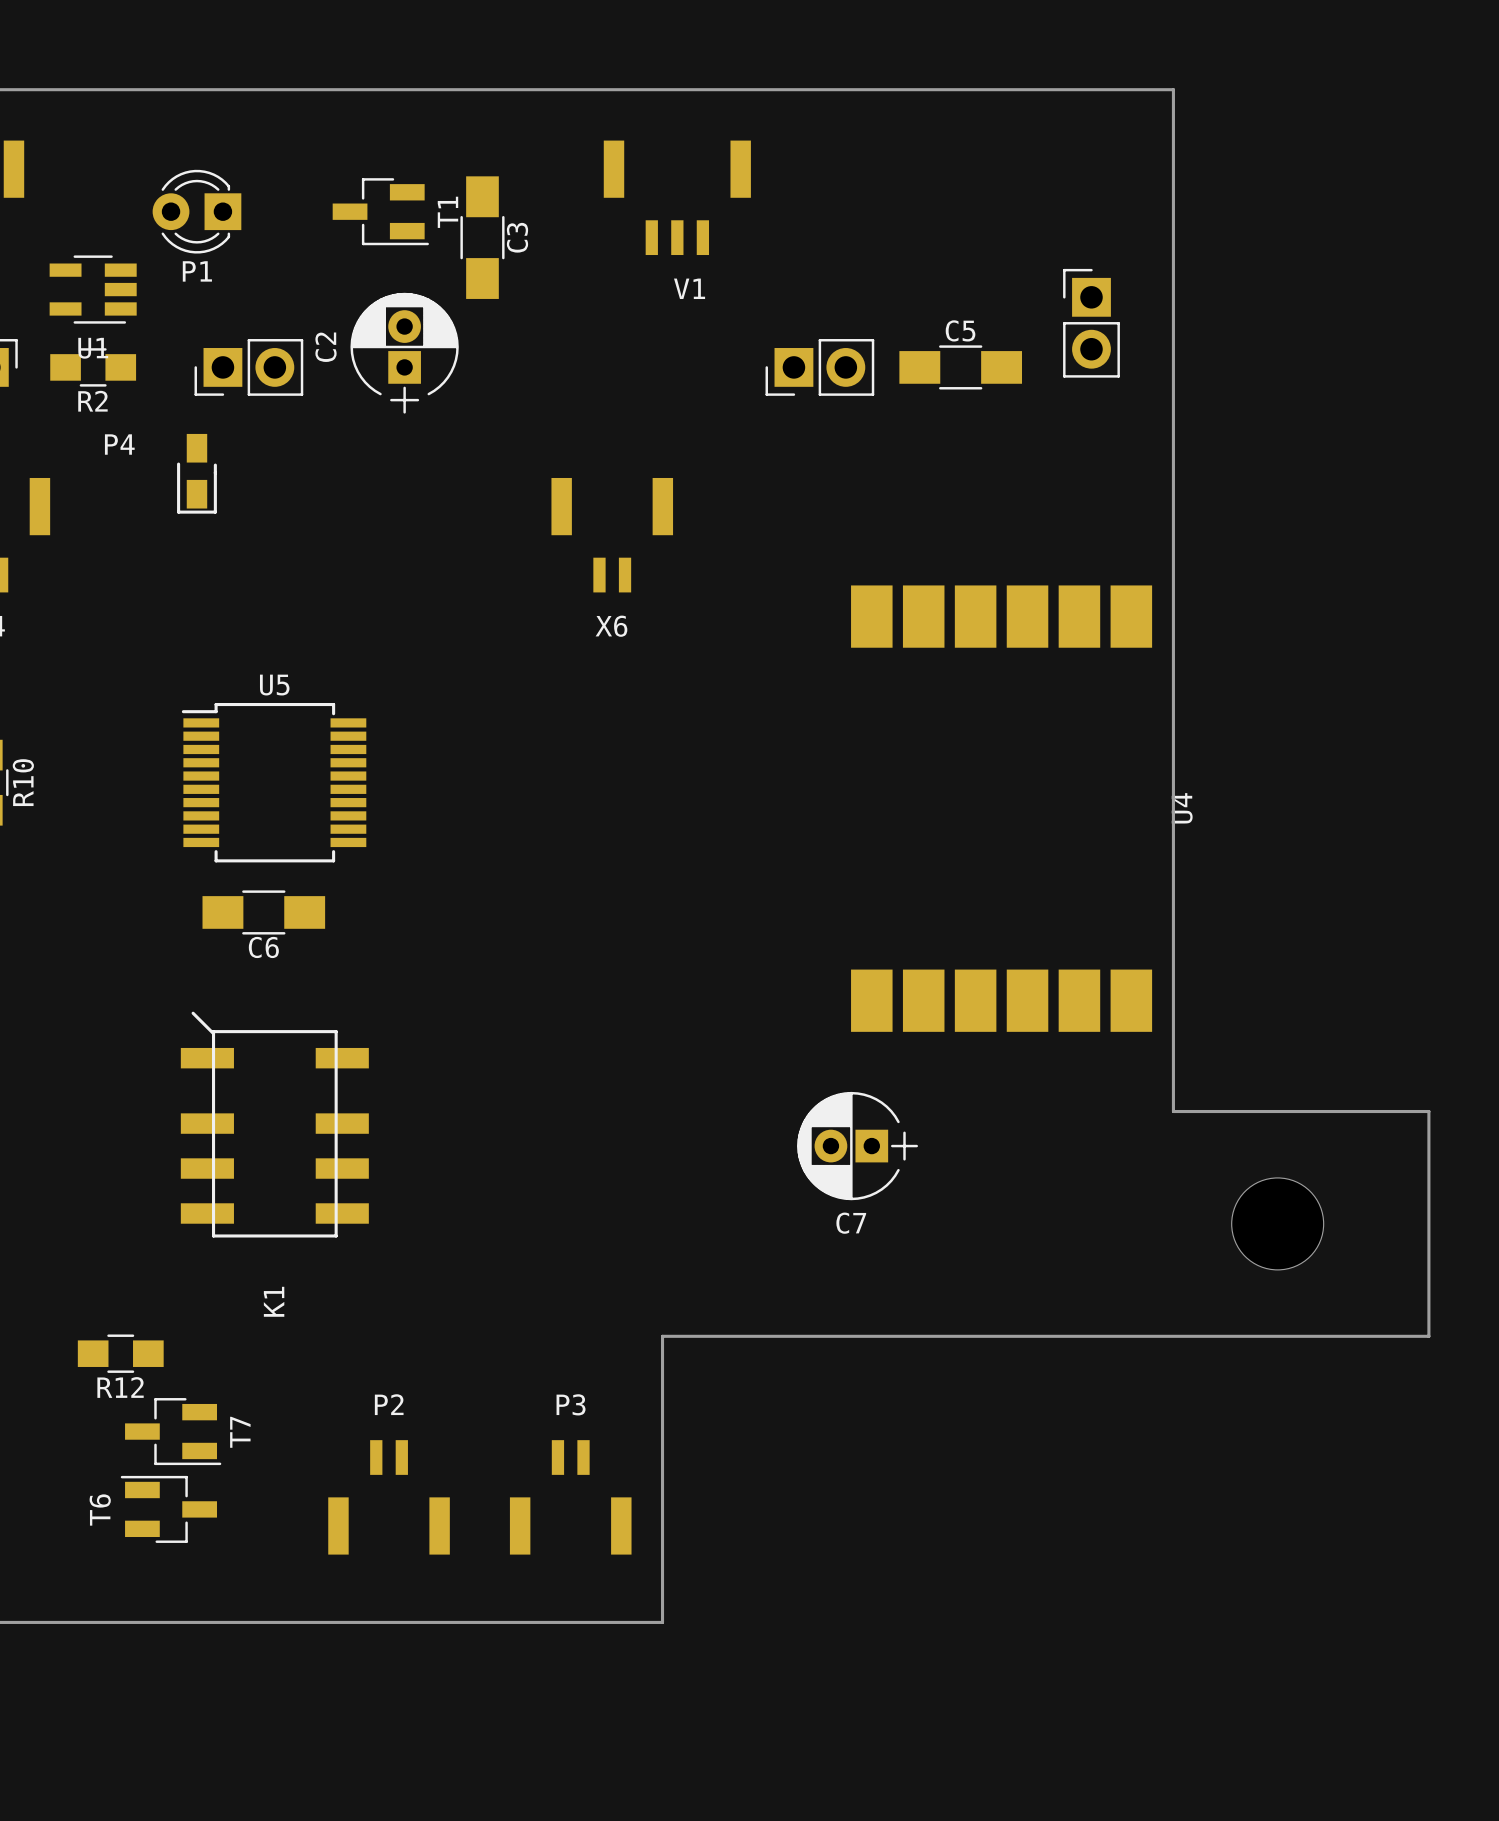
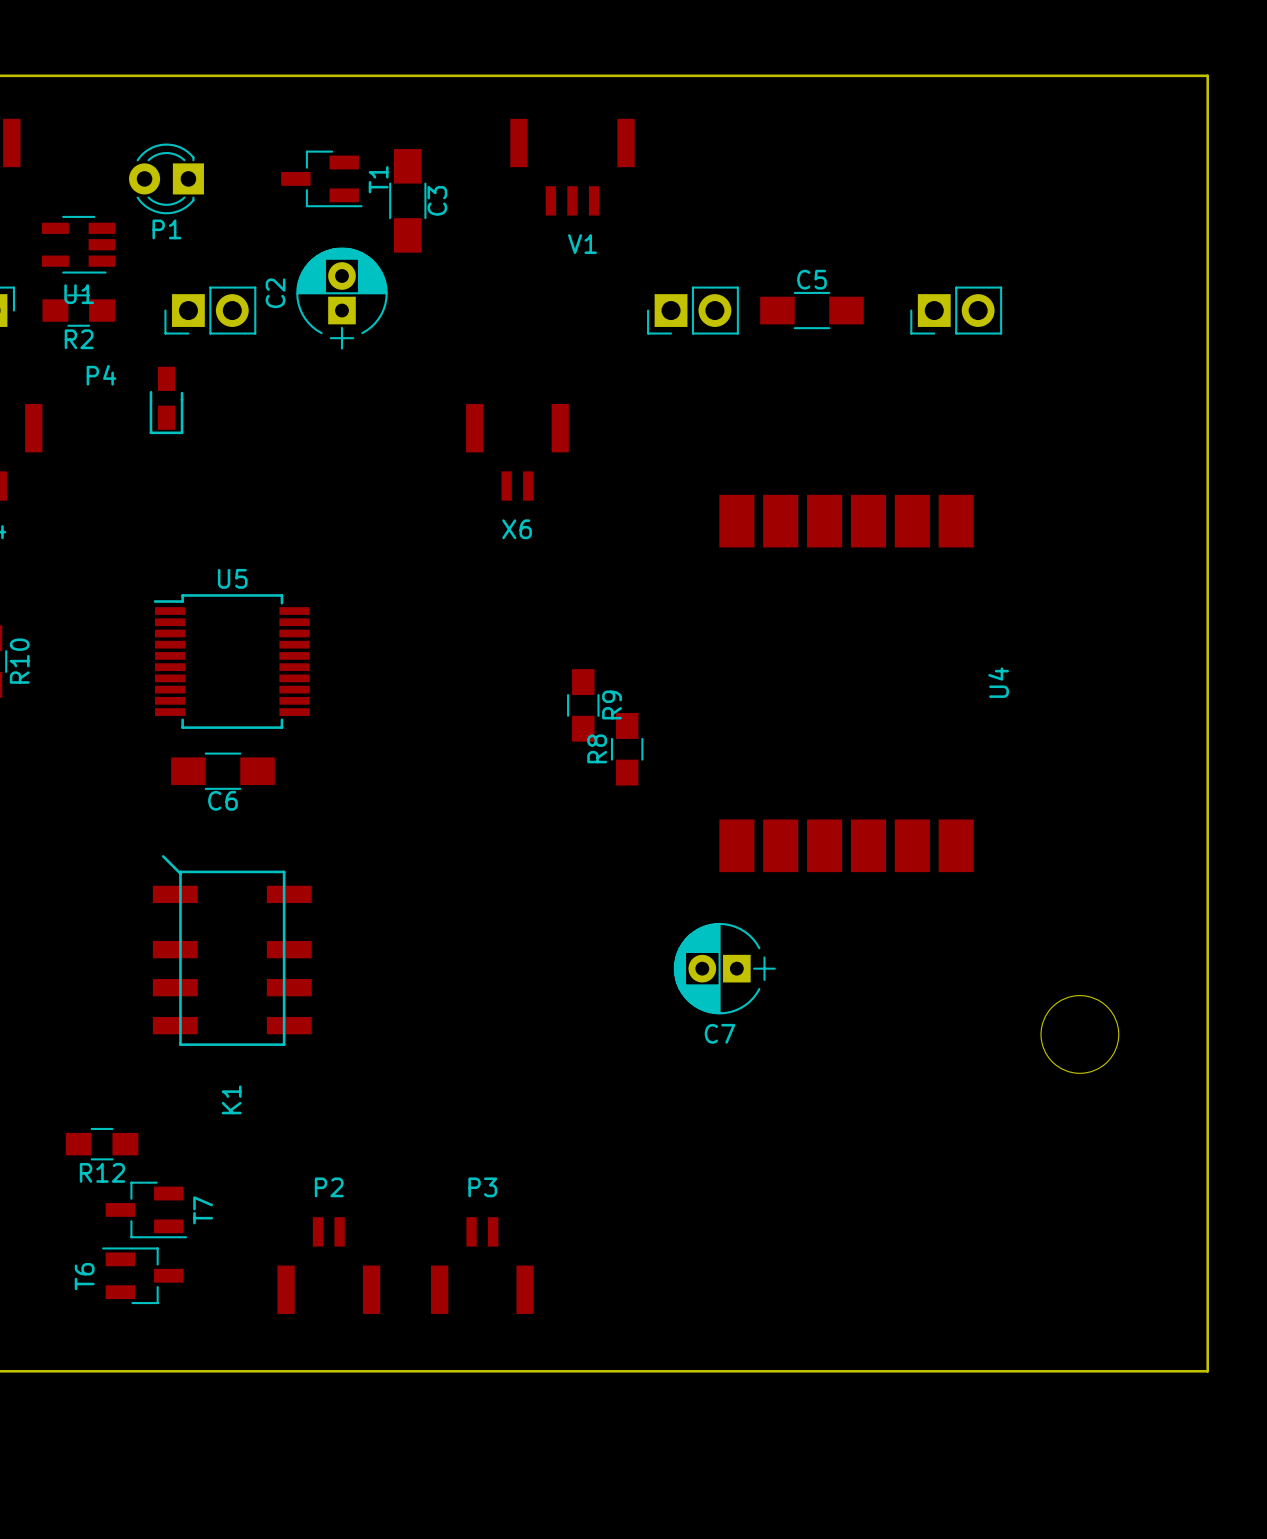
board edge: (1173, 89) (1173, 1111) (1428, 1111) -> (991, 75) (1207, 75) (1207, 939)
part rotation: 0° (1091, 323) -> 90° counterclockwise (956, 310)
R9: none -> (583, 705)
R8: none -> (627, 749)
board edge: (1428, 1336) (662, 1336) (662, 1622) -> (1207, 1129) (1207, 1371) (559, 1371)

